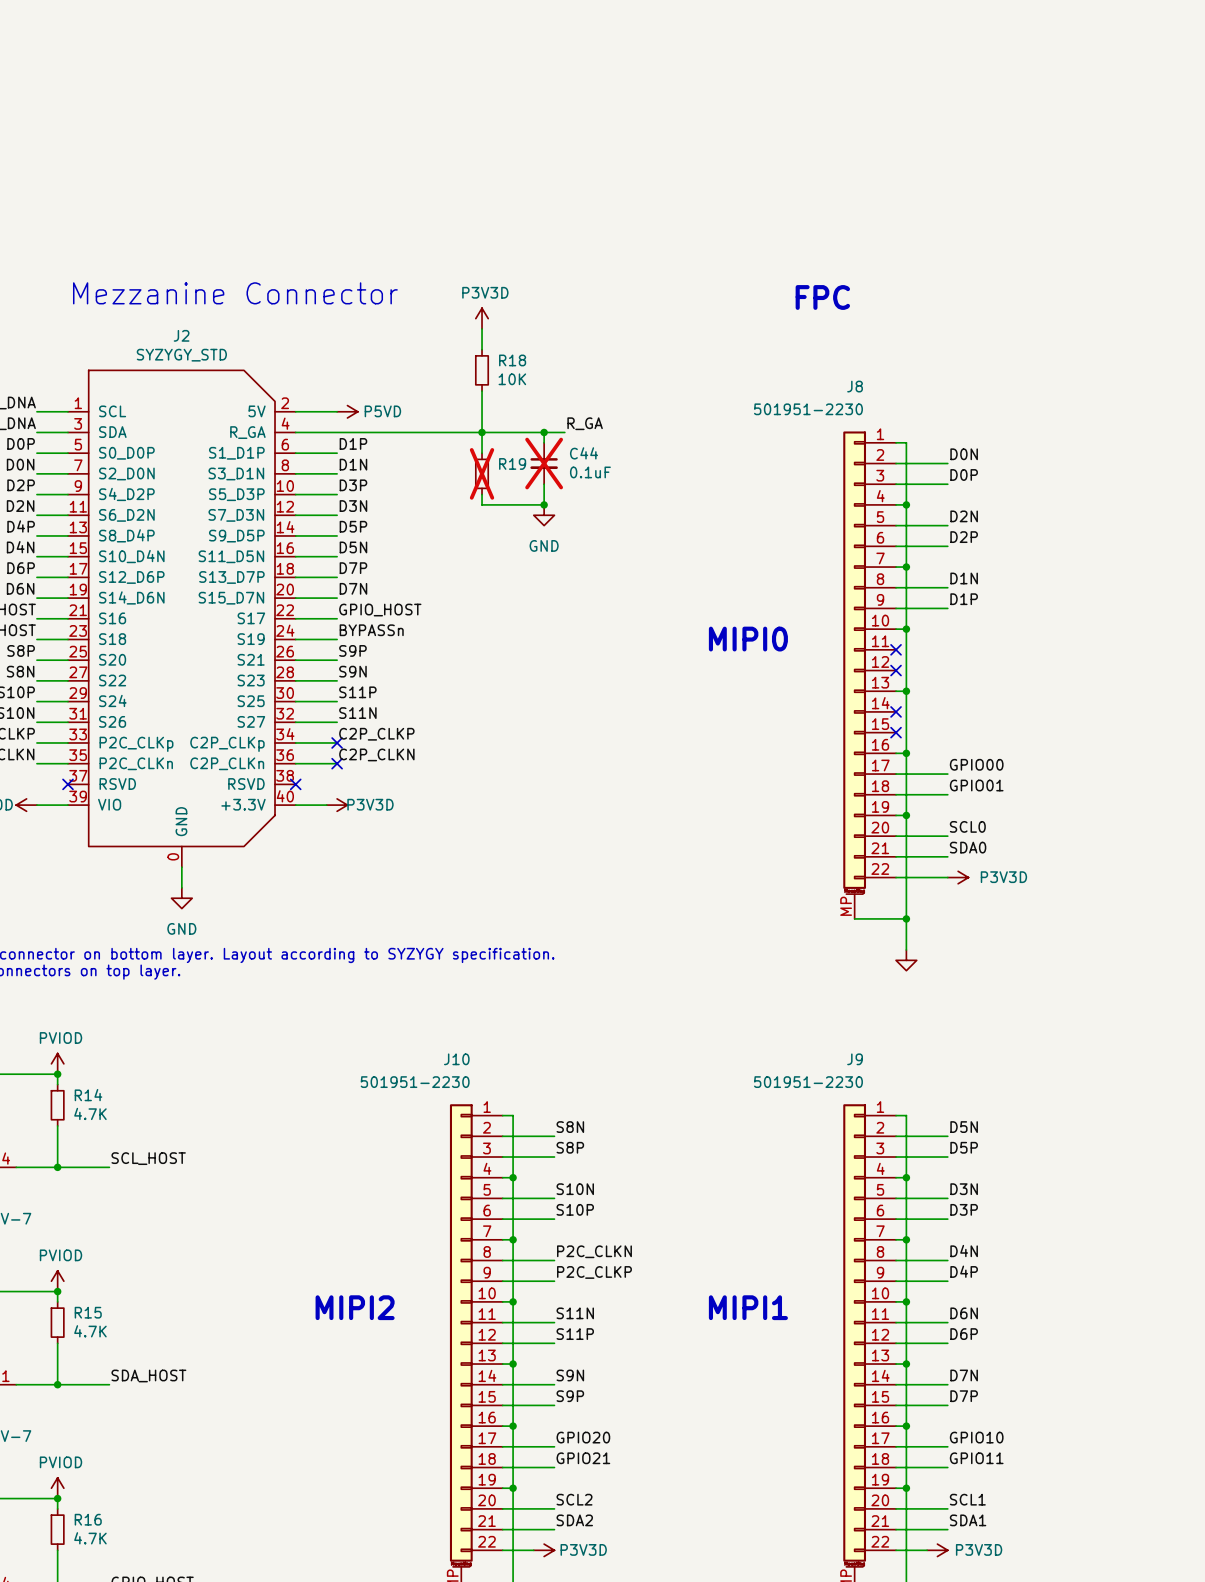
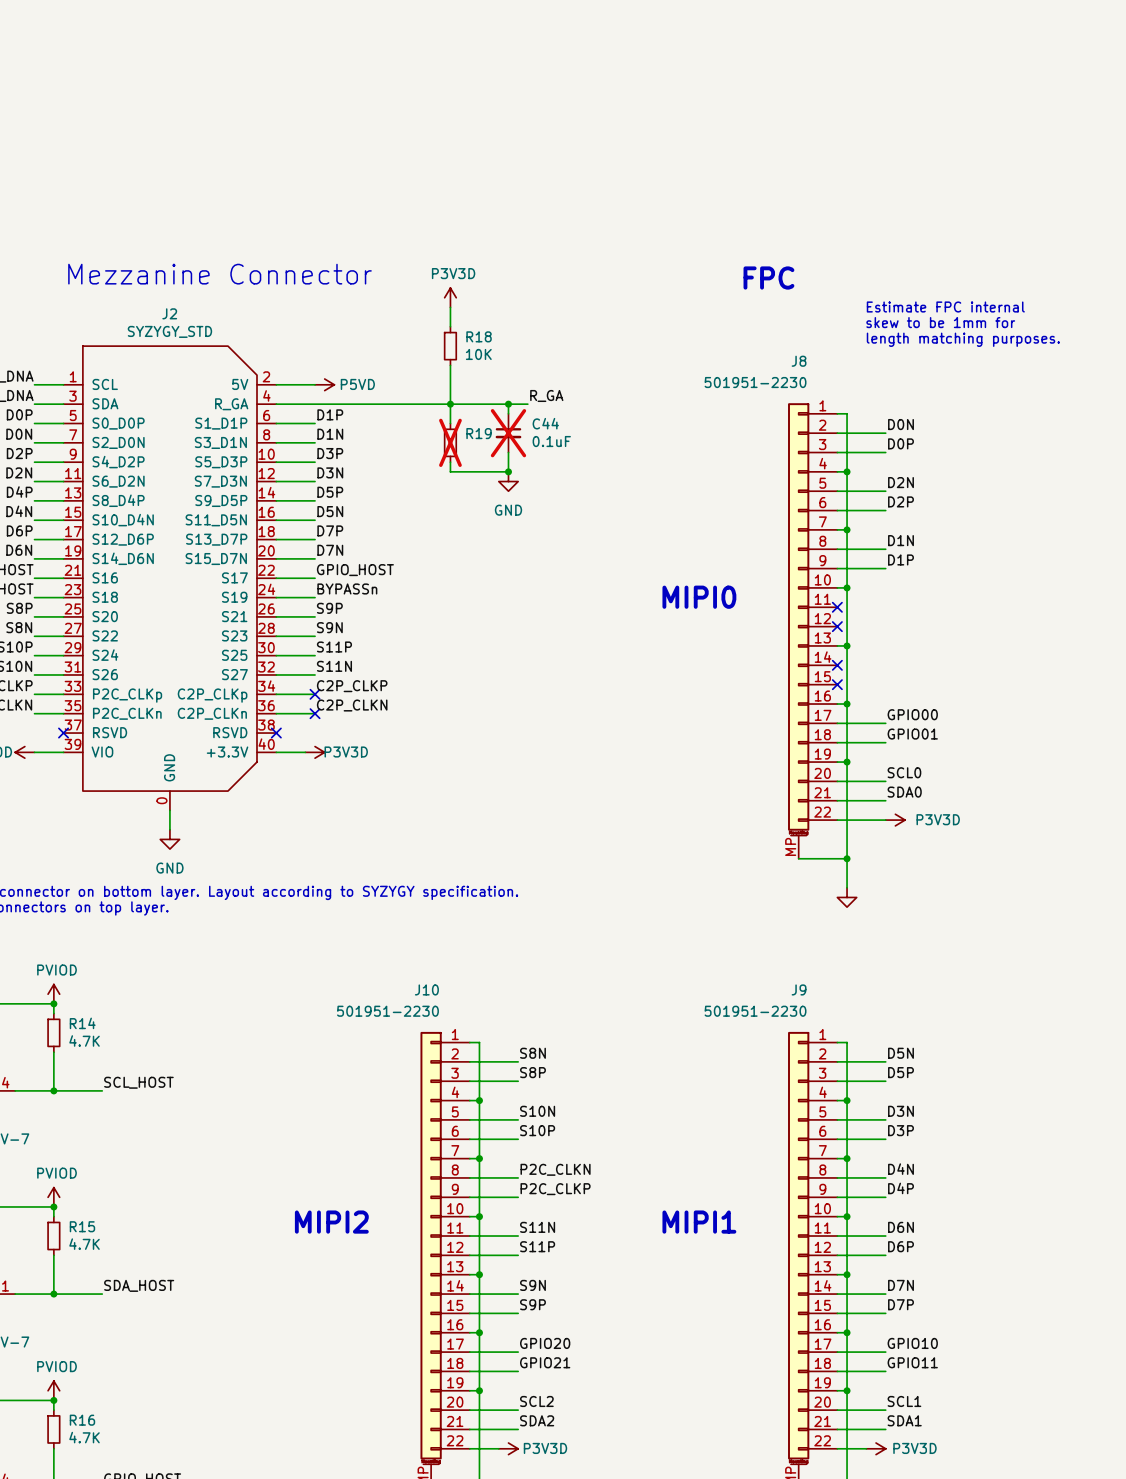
text: none -> Estimate FPC internal (945, 307)
text: none -> skew to be 1mm for (940, 322)
text: none -> length matching purposes. (963, 339)

